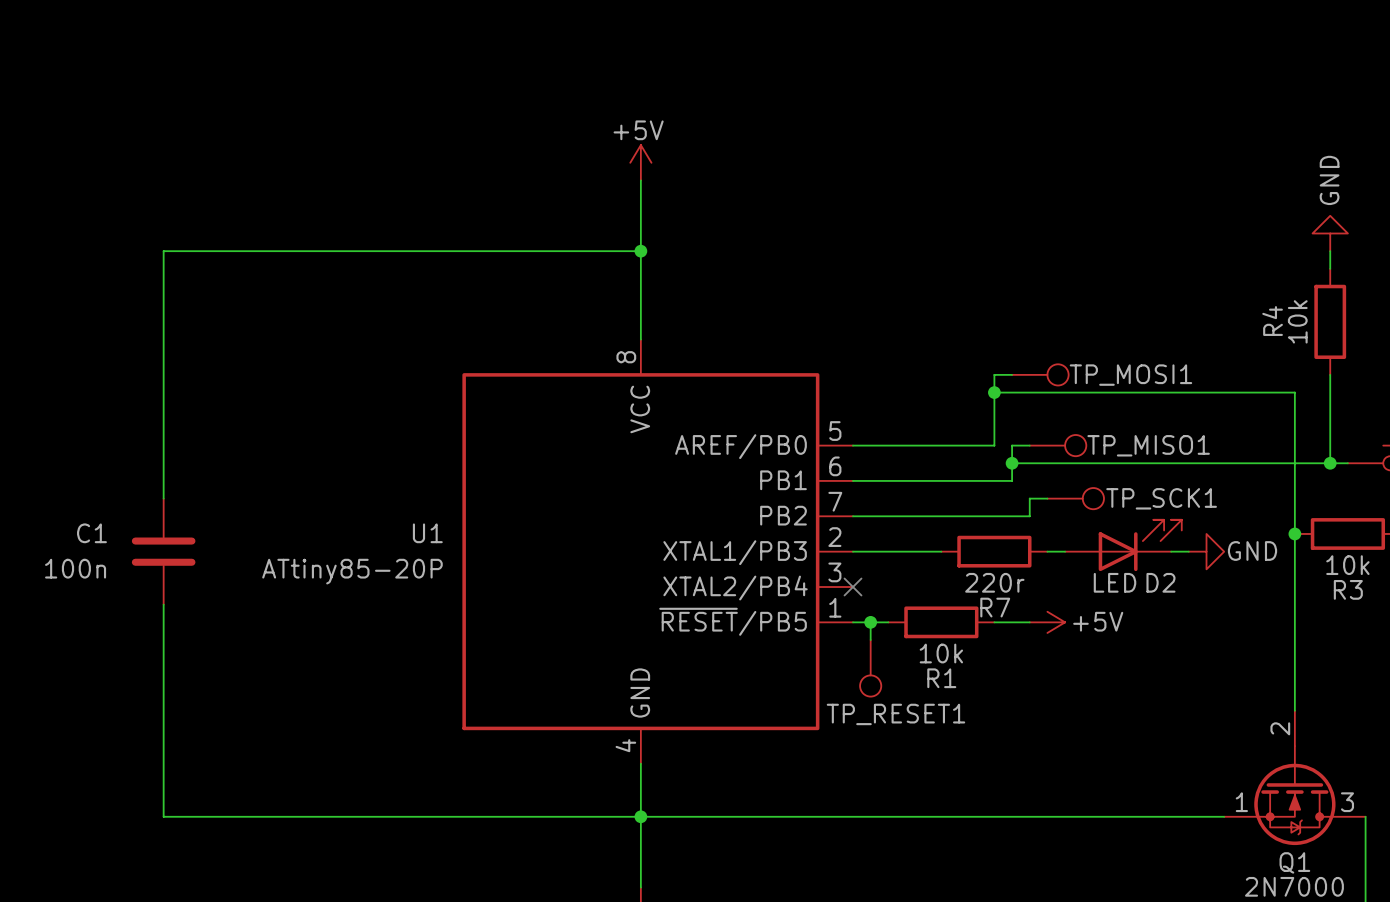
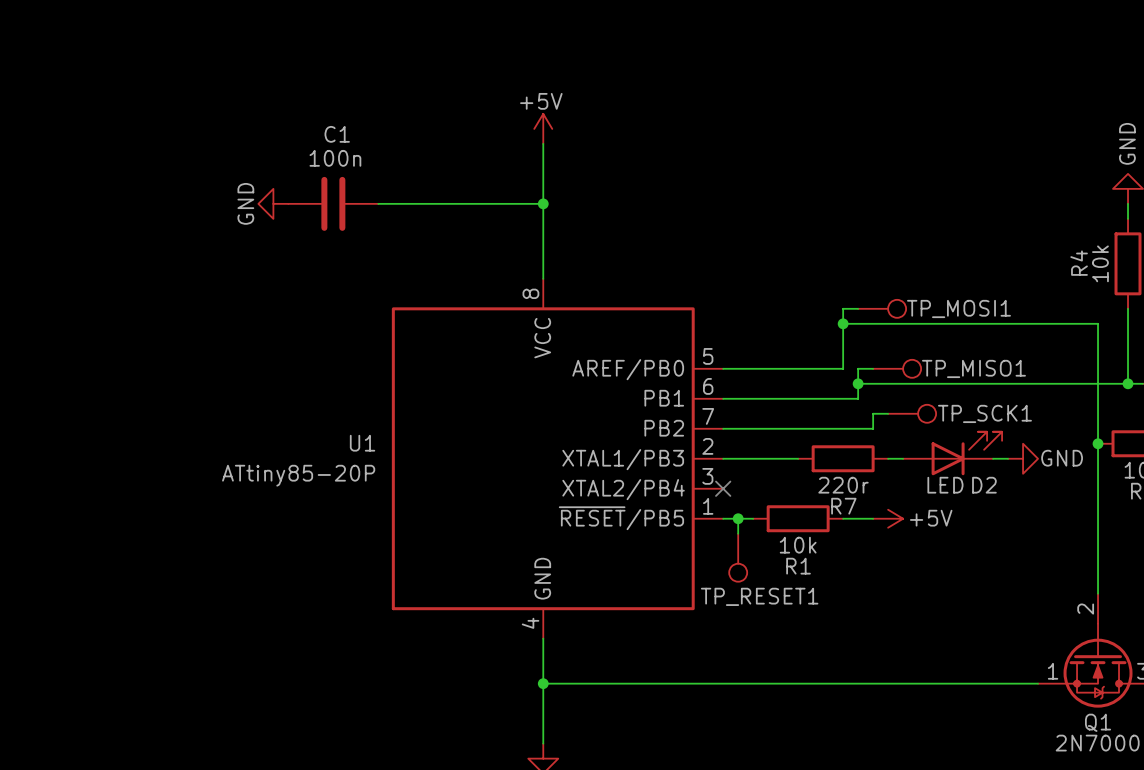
power symbol: none -> GND (273, 203)
wire: (446, 251) (163, 251) (163, 498) -> none
C1 rotation: 0° (163, 551) -> 90° clockwise (333, 203)
C1 position: (163, 551) -> (333, 203)
C1 value position: 100n (75, 568) -> 100n (335, 158)
wire: (163, 604) (163, 816) (640, 816) -> none

